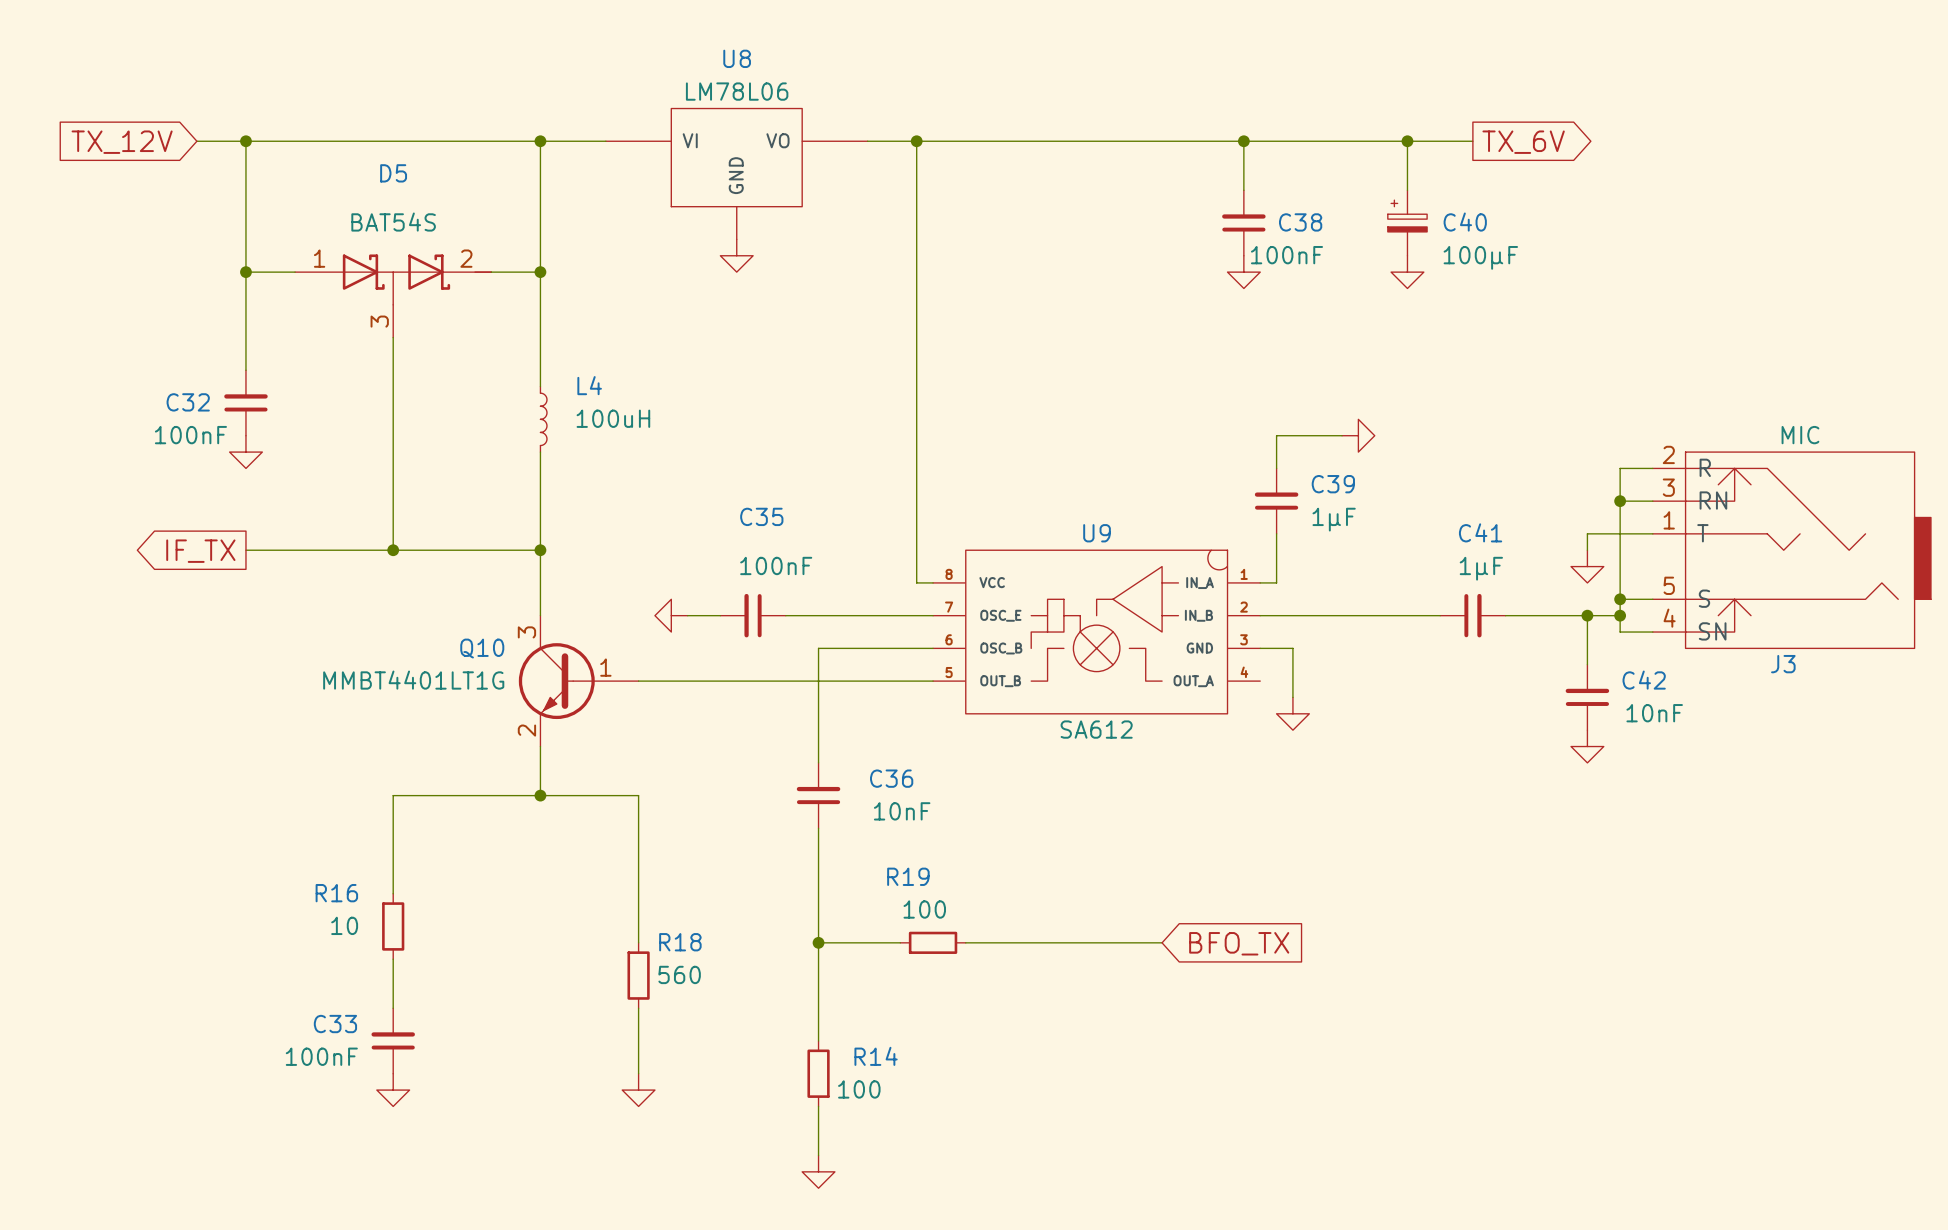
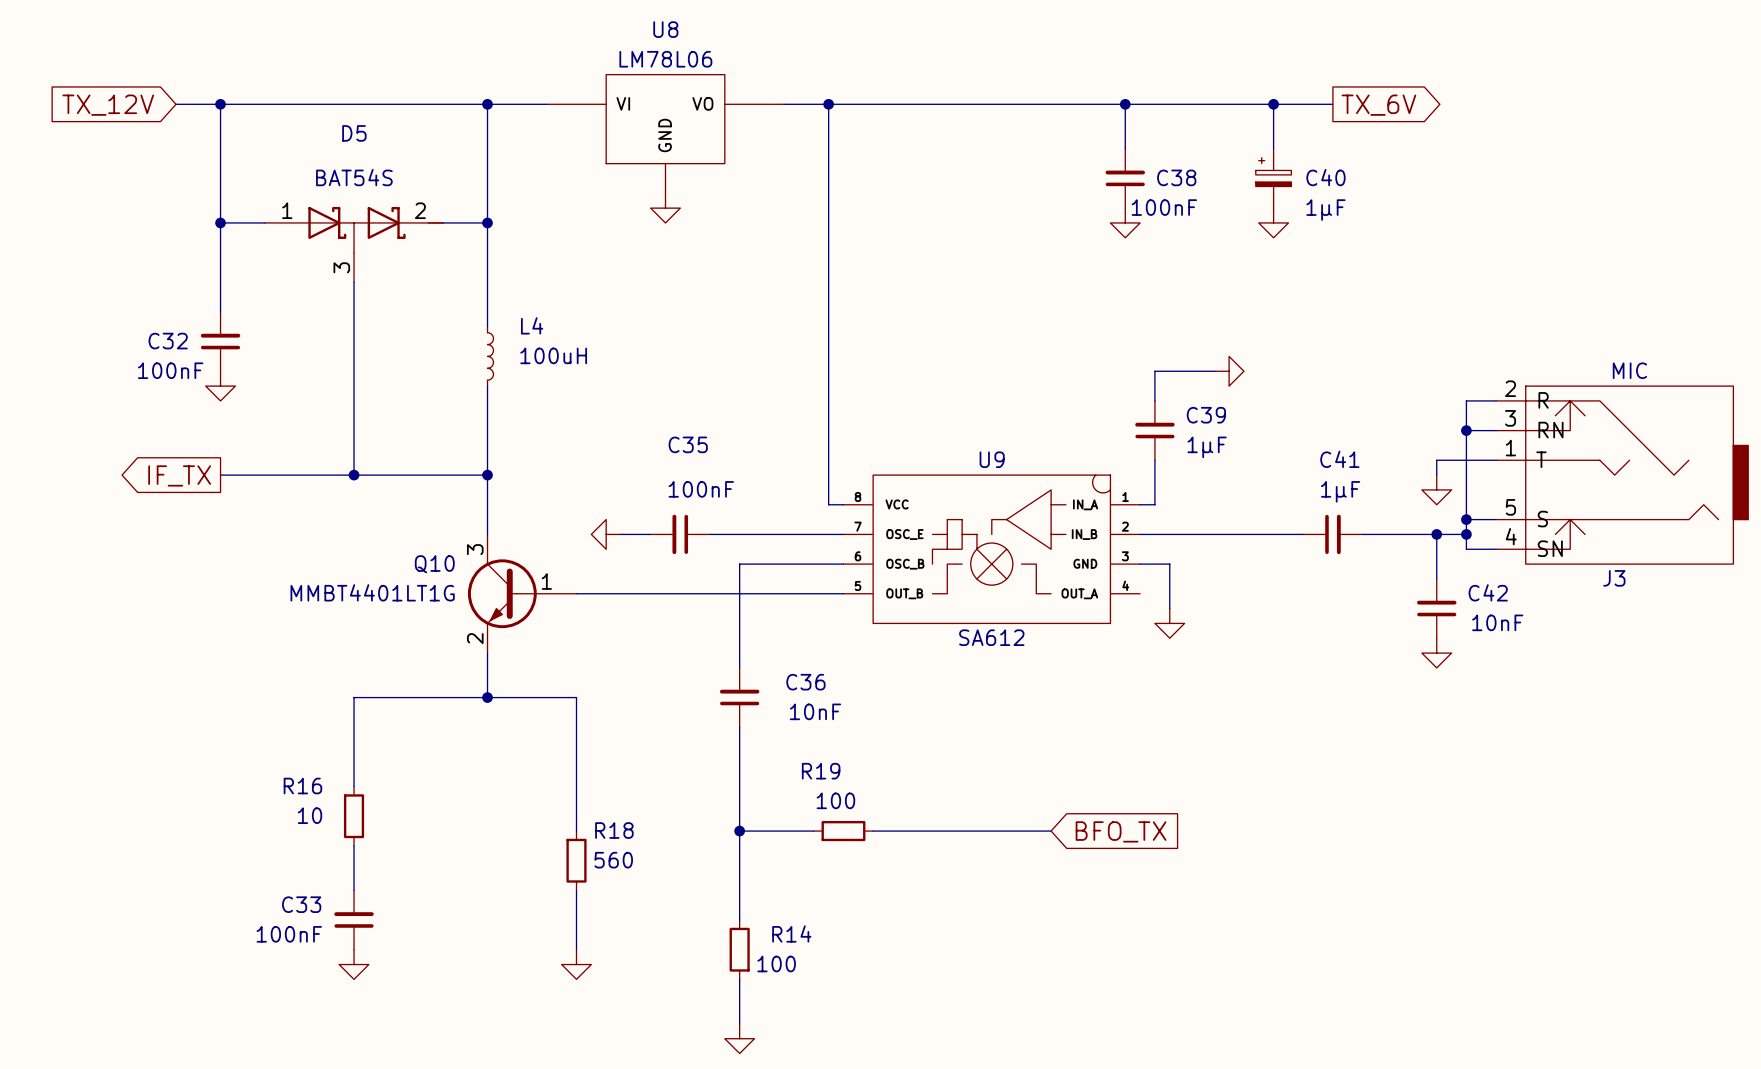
C40 value: 100µF (1480, 257) -> 1µF (1325, 210)

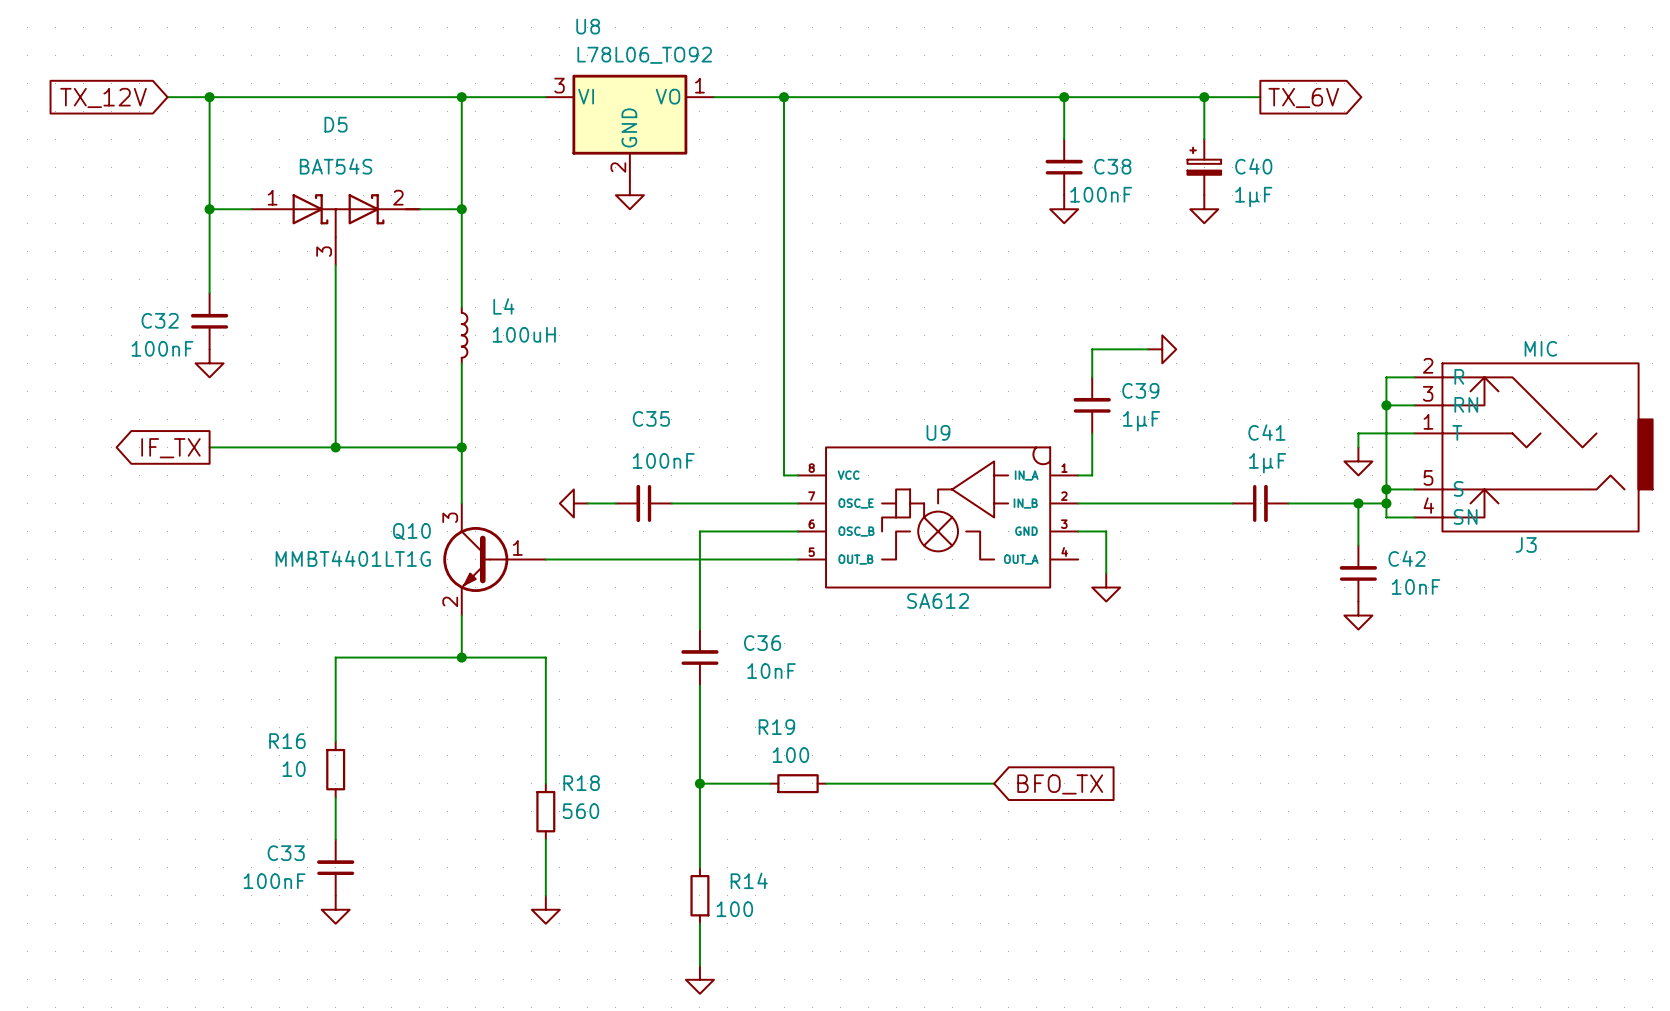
U8 name position: U8 (665, 29) -> U8 (588, 26)
U8 value: LM78L06 (665, 59) -> L78L06_TO92 (644, 55)
U8 symbol: [546, 74, 785, 194] -> [545, 74, 714, 182]

